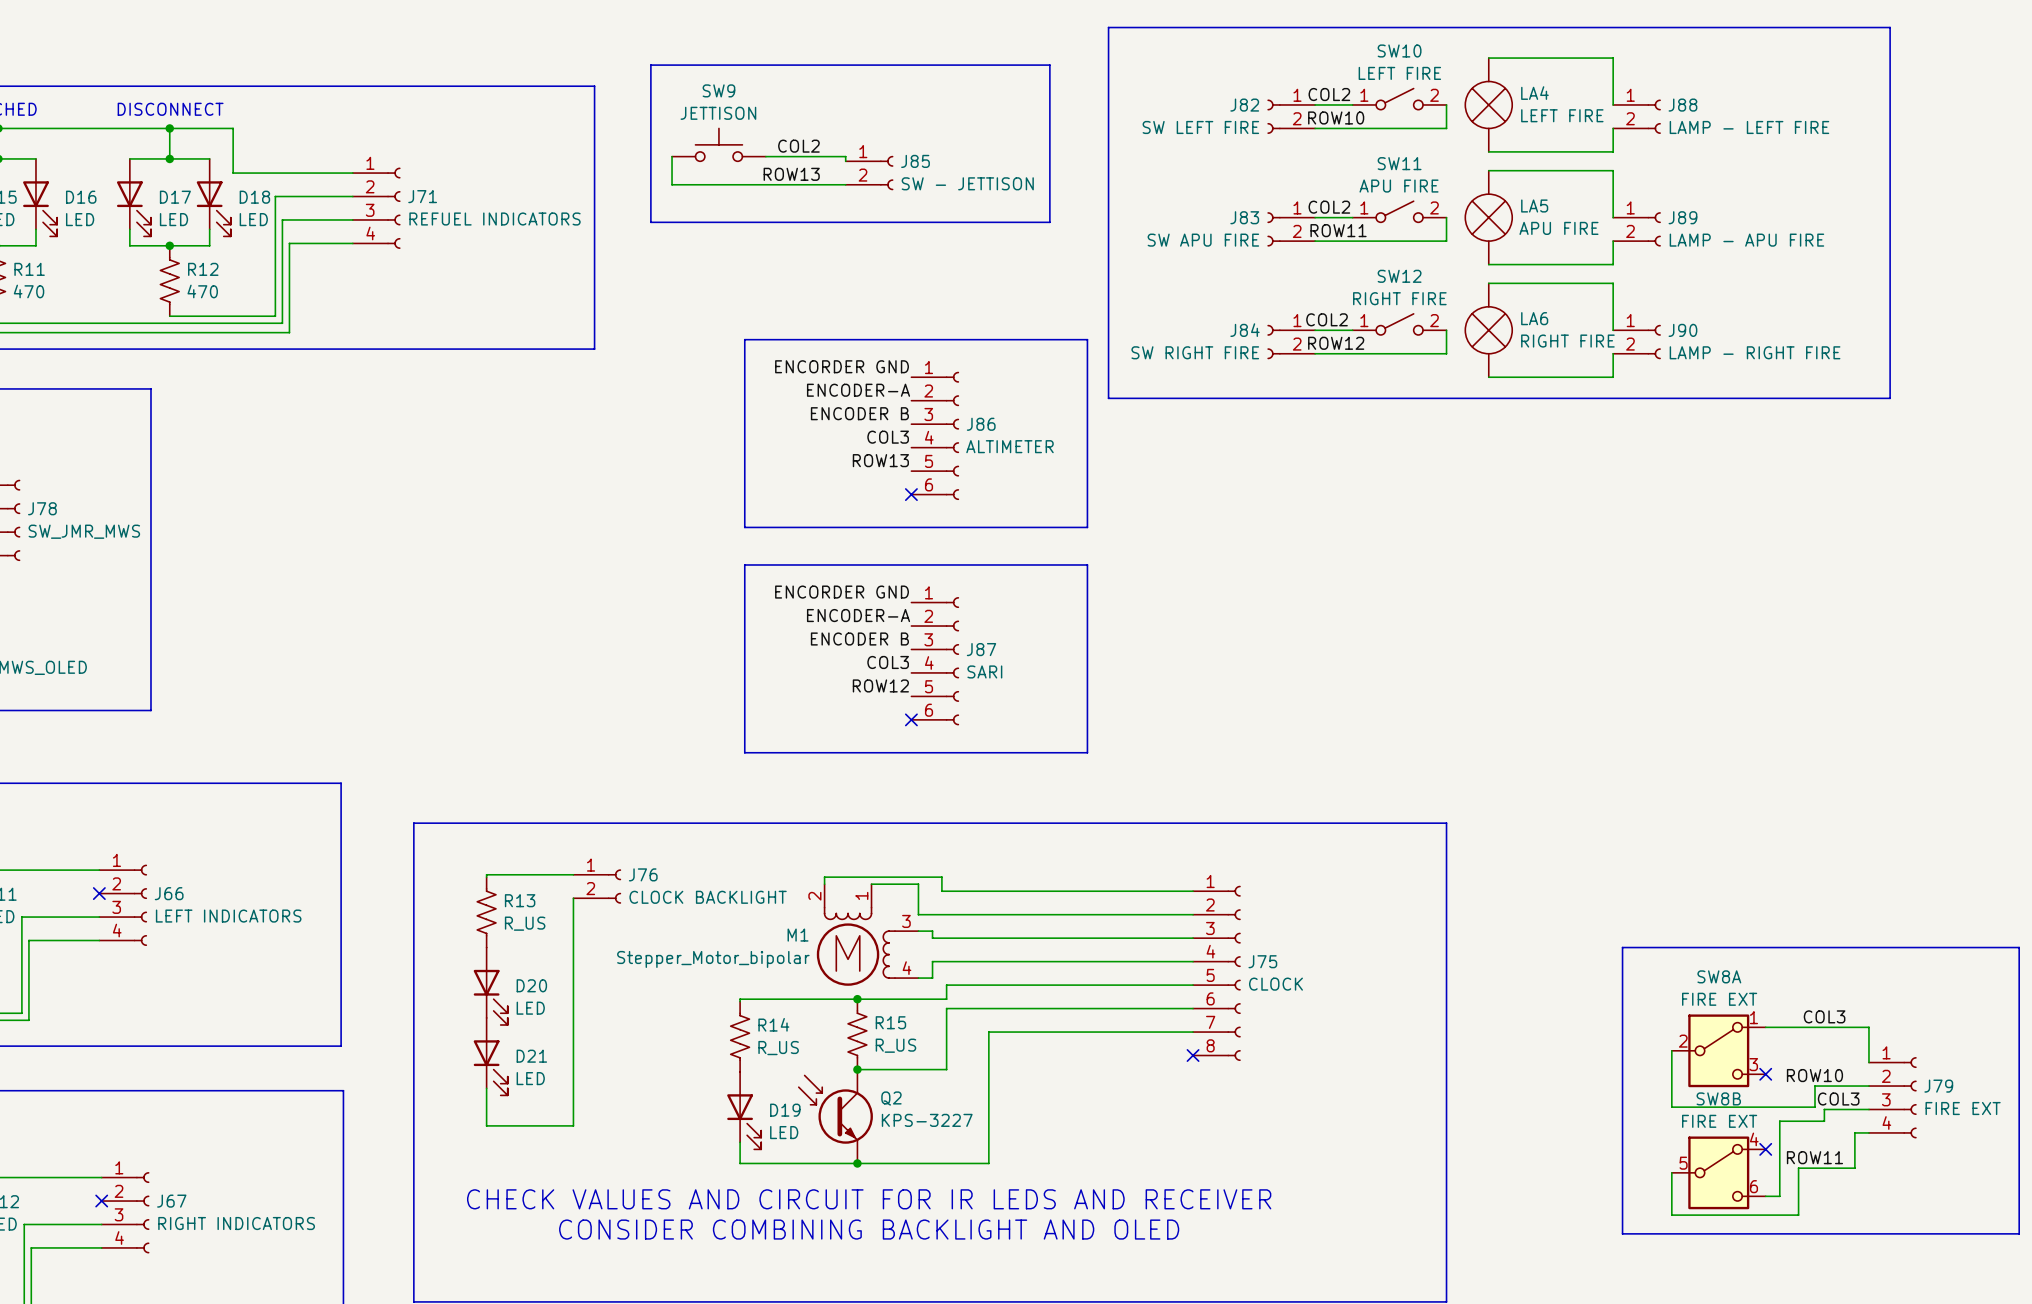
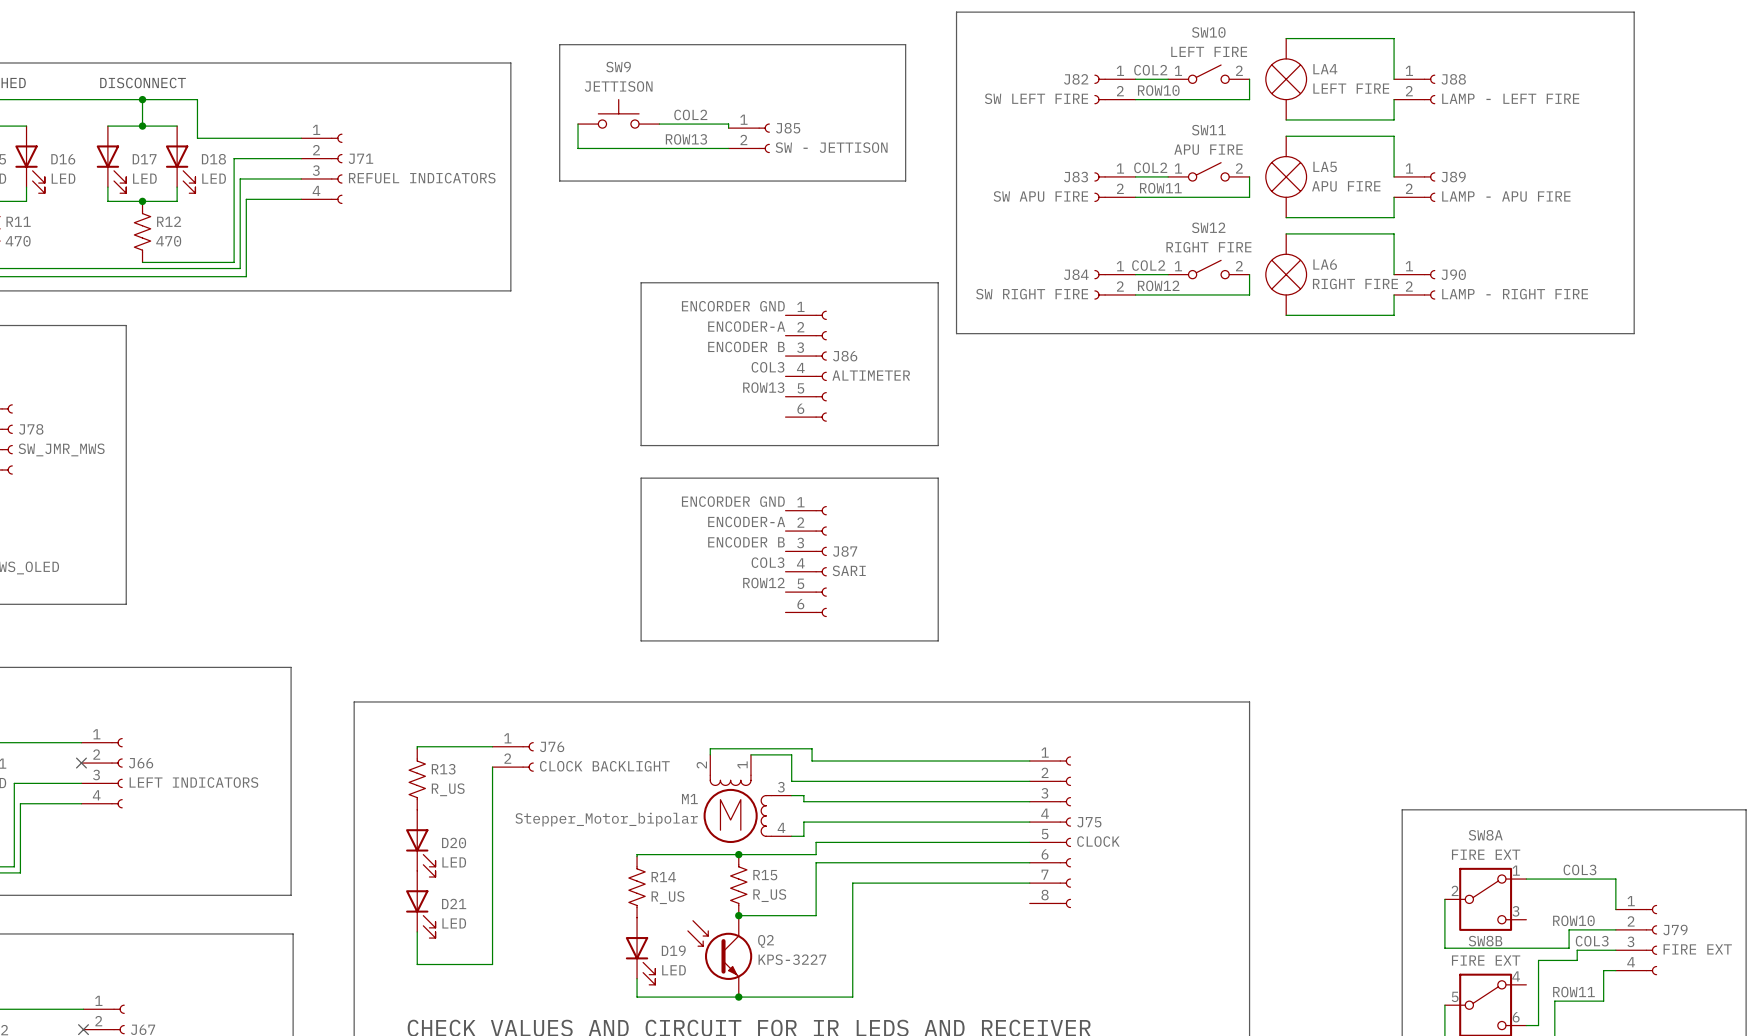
no-connect mark: (911, 494) -> none
no-connect mark: (911, 719) -> none
no-connect mark: (1193, 1055) -> none
no-connect mark: (1765, 1074) -> none
no-connect mark: (1765, 1149) -> none

